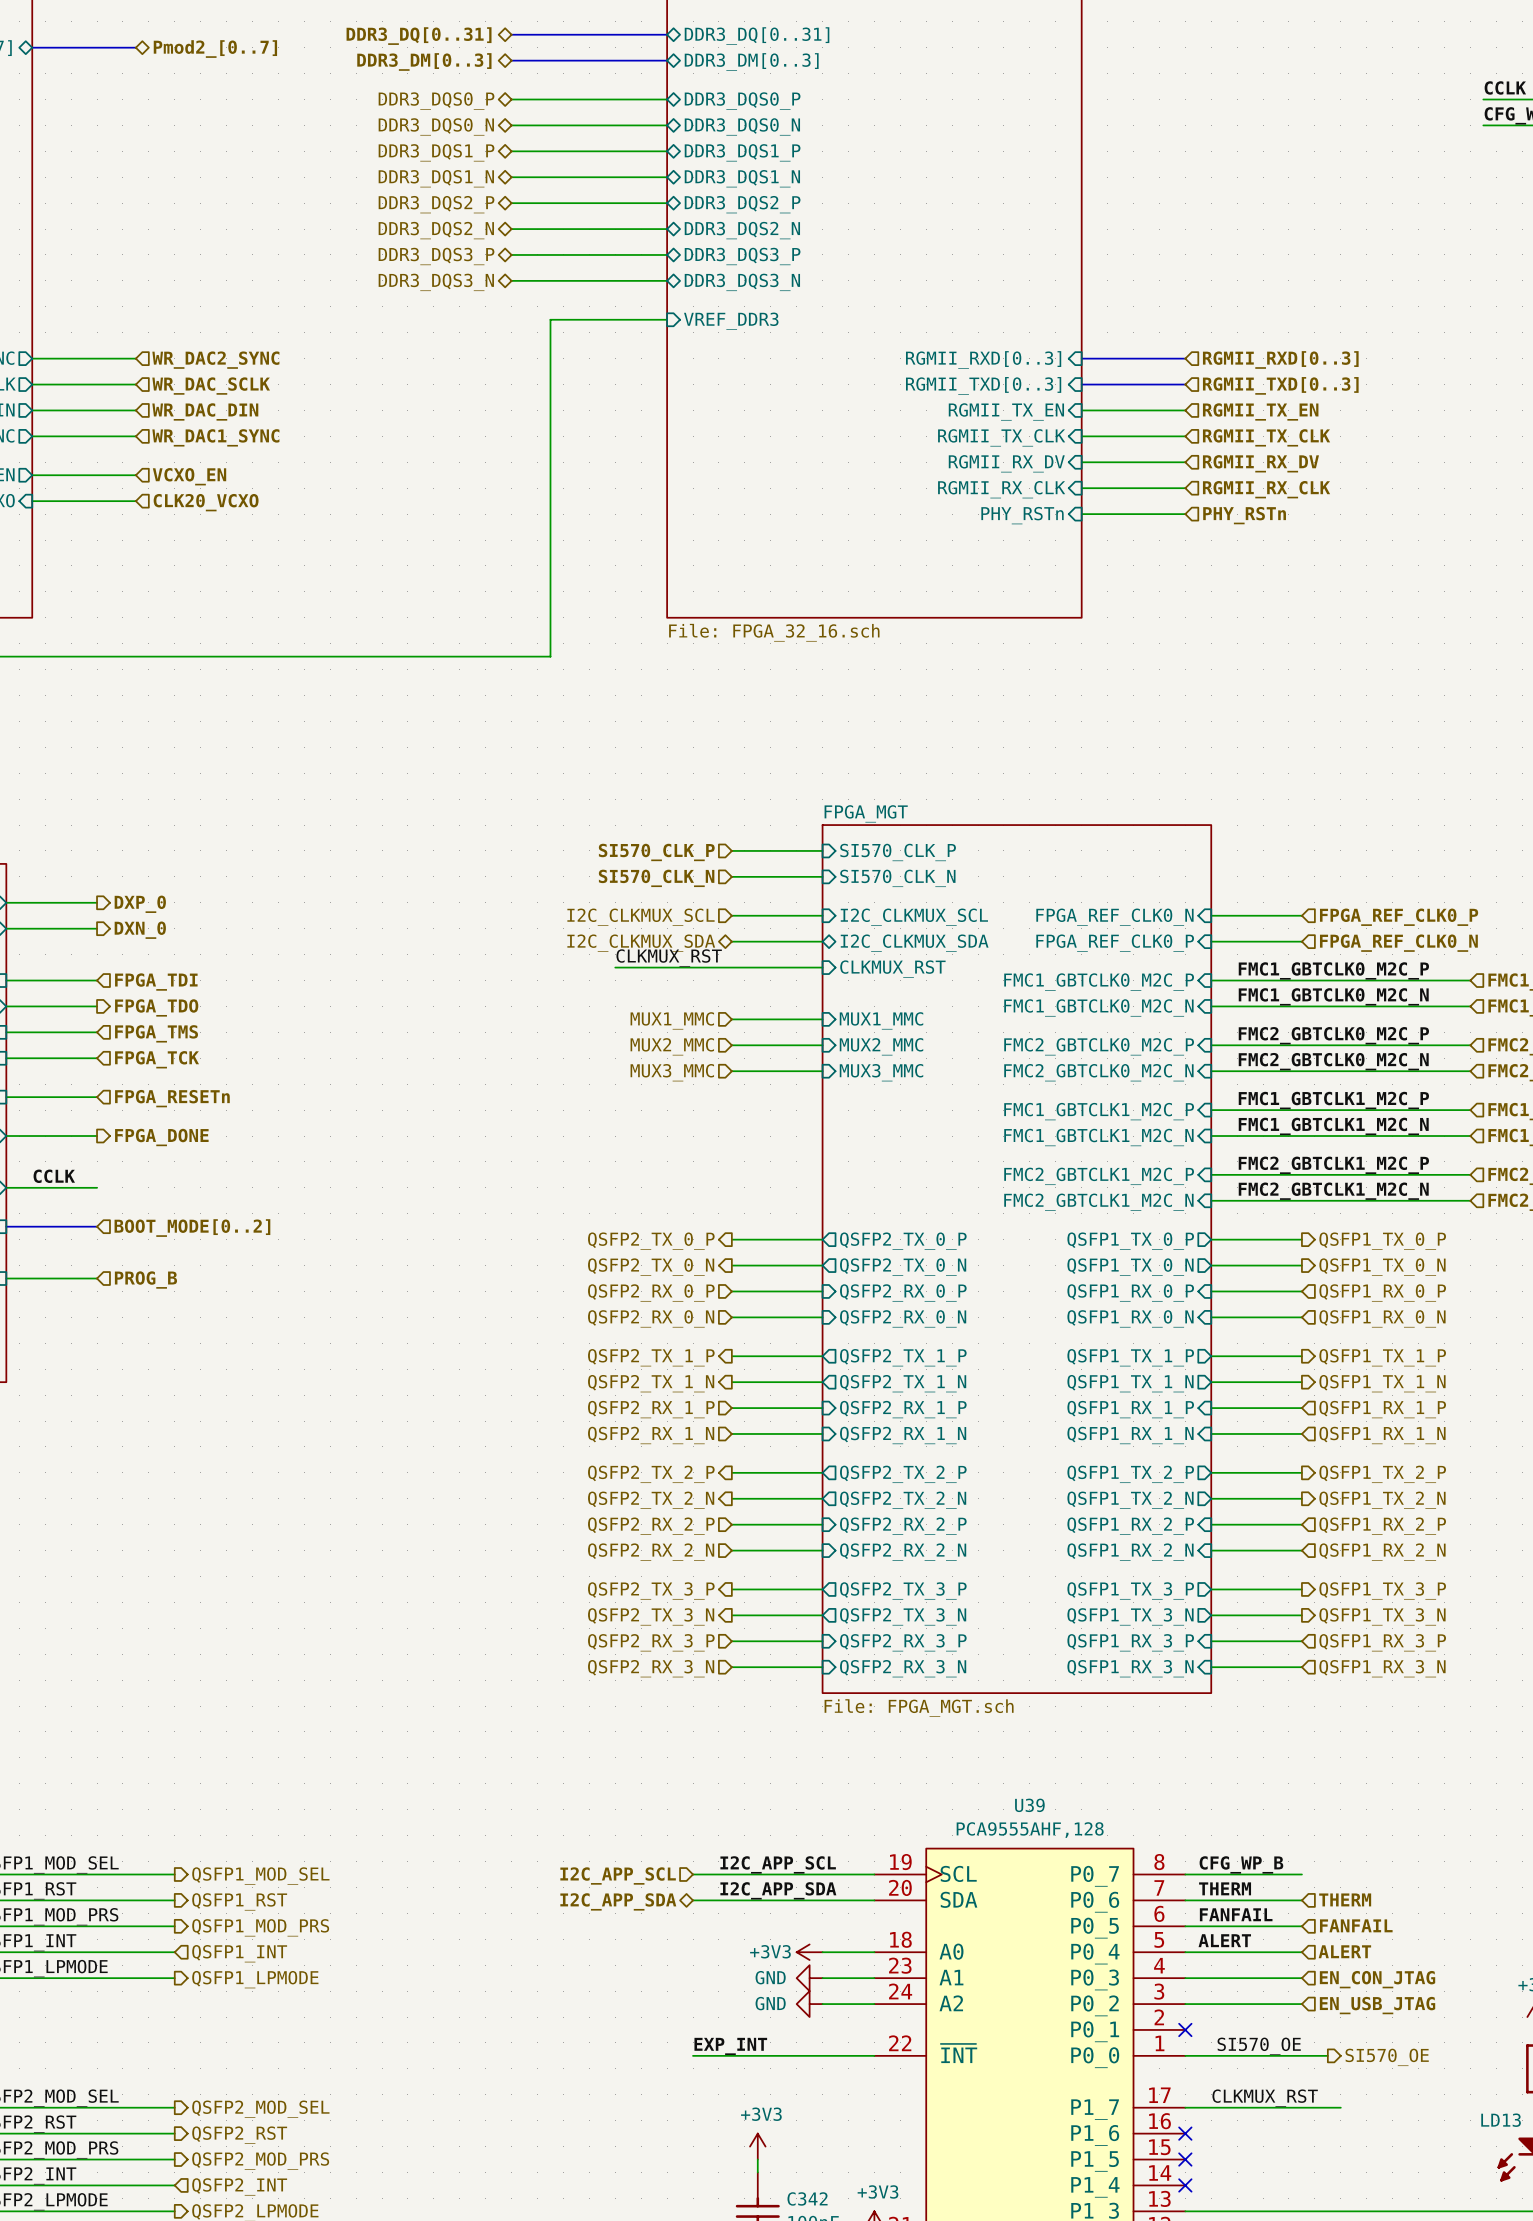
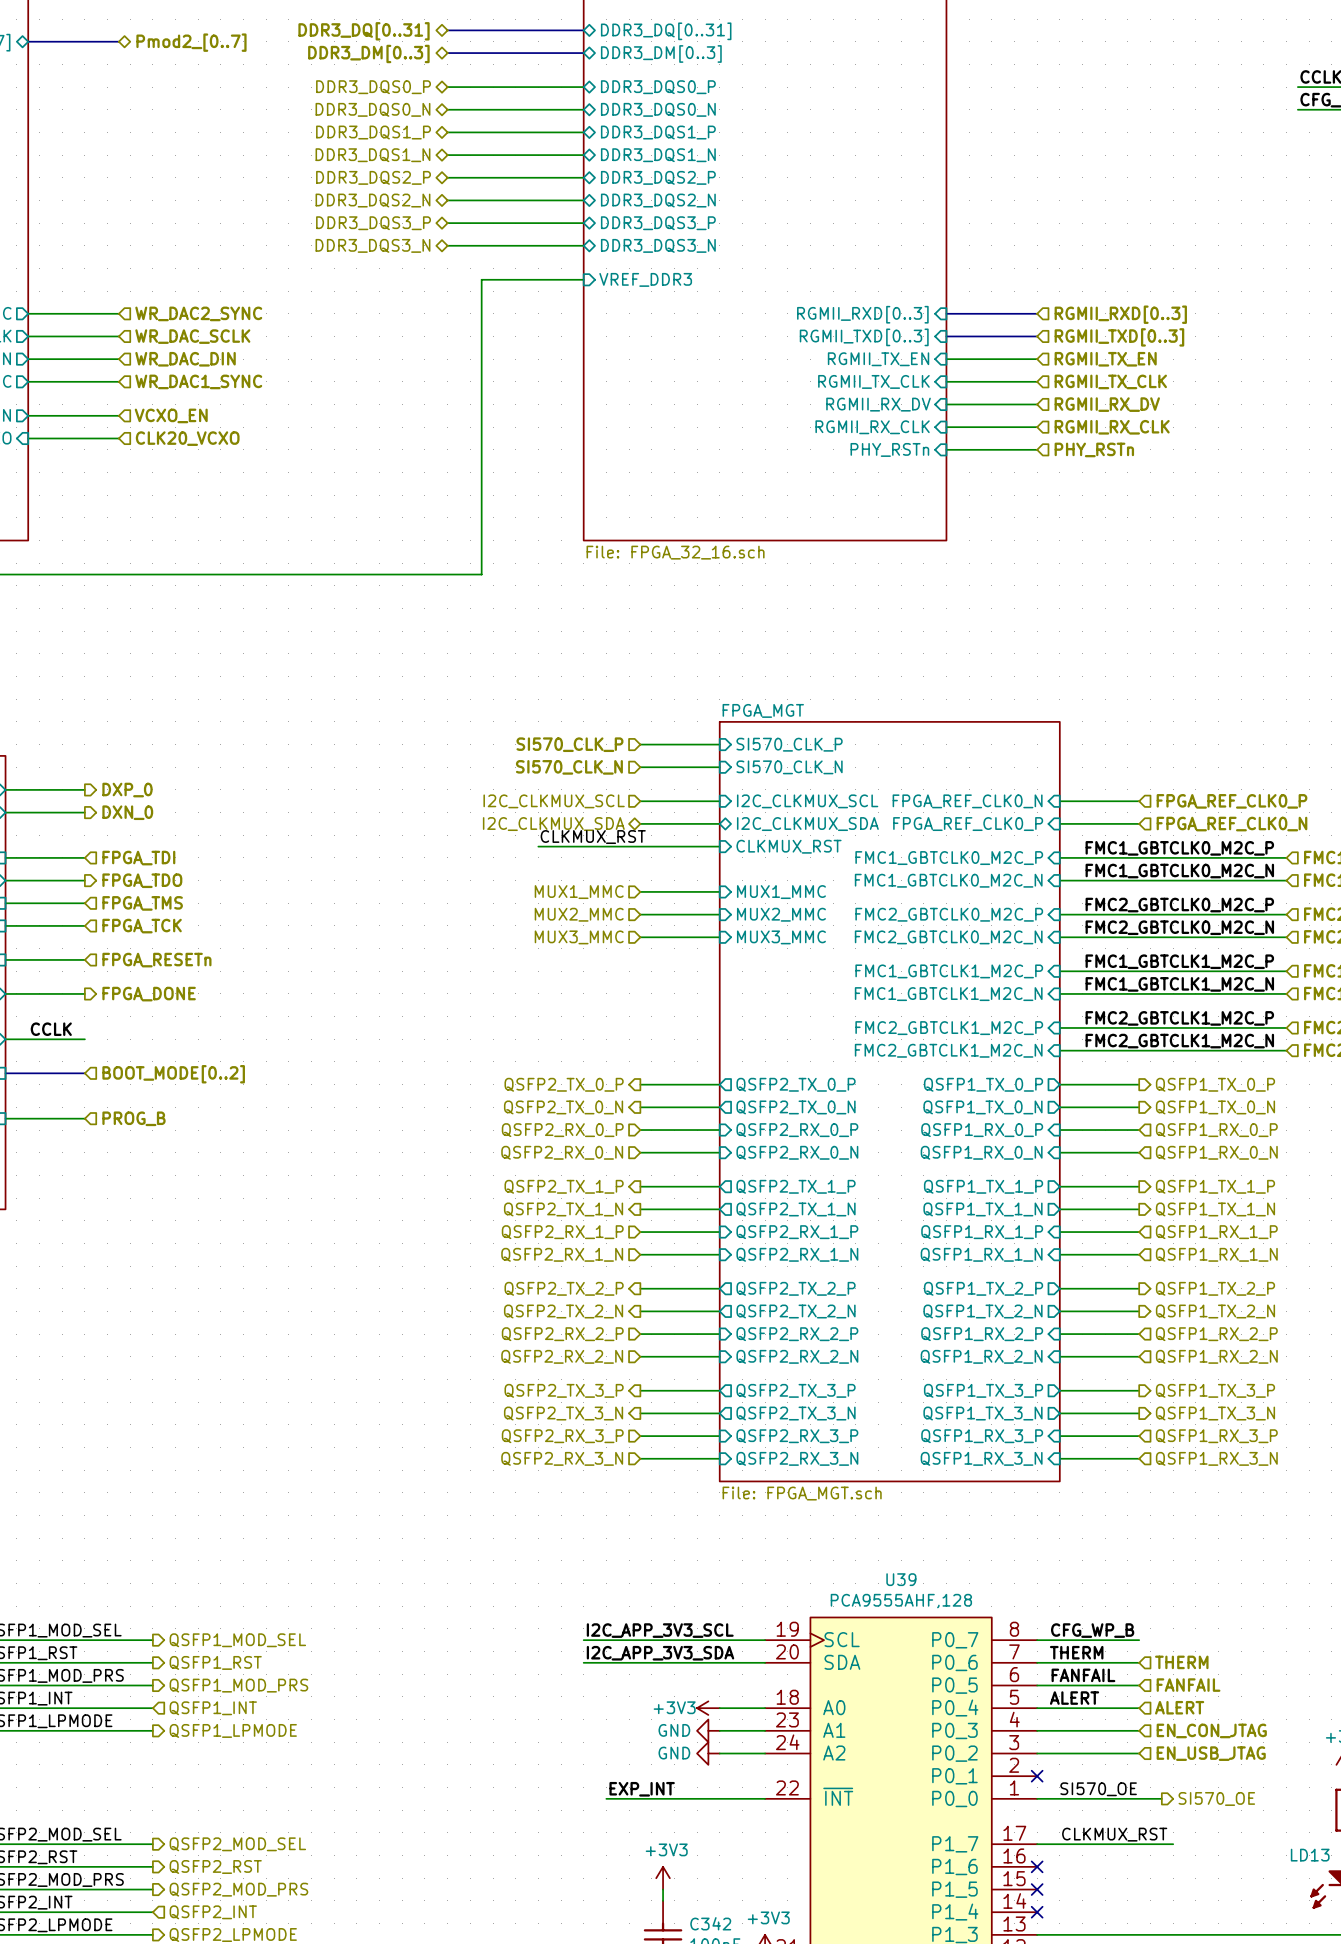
label: none -> I2C_APP_3V3_SCL (660, 1630)
label: I2C_APP_SCL (778, 1864) -> none
wire: none -> (583, 1640) (606, 1640)
hierarchical label: I2C_APP_SCL (618, 1875) -> none
label: none -> I2C_APP_3V3_SDA (660, 1653)
label: I2C_APP_SDA (778, 1890) -> none
wire: none -> (583, 1662) (606, 1662)
hierarchical label: I2C_APP_SDA (618, 1901) -> none

